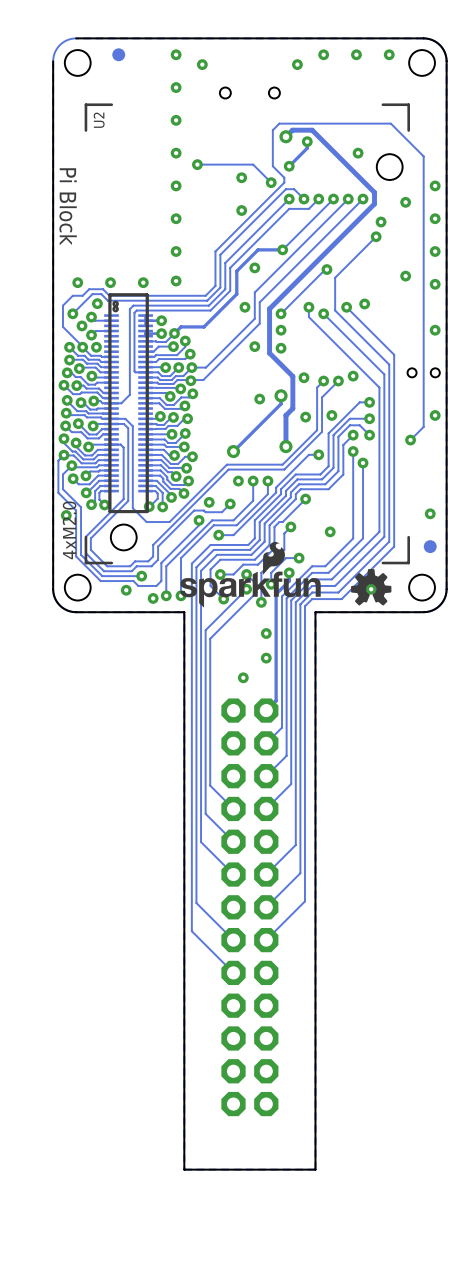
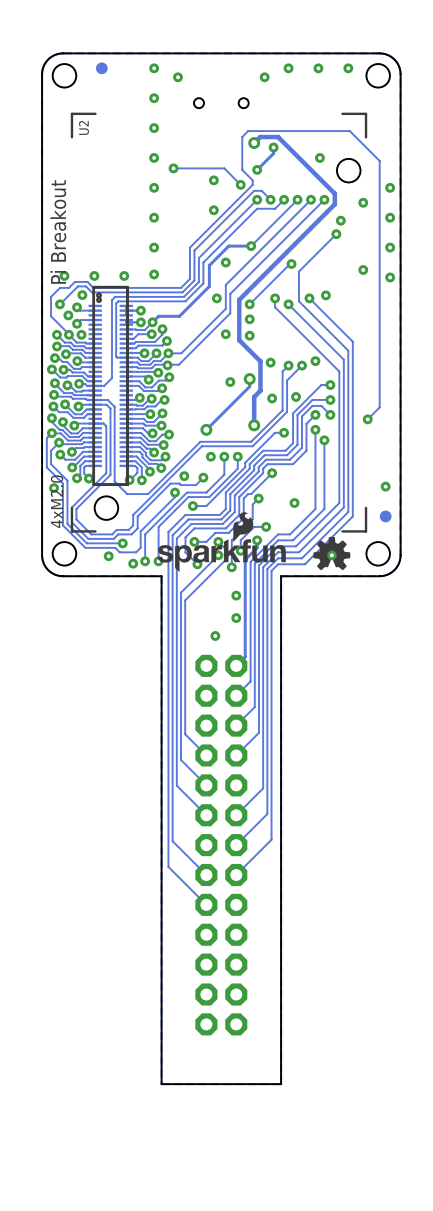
board edge: none -> (62, 53) (54, 54) (48, 59) (43, 66) (42, 74)
text: Pi Block (68, 206) -> none
text: none -> Pi Breakout (58, 231)
via: (435, 330) -> none
part: (423, 372) -> none
via: (435, 415) -> none

